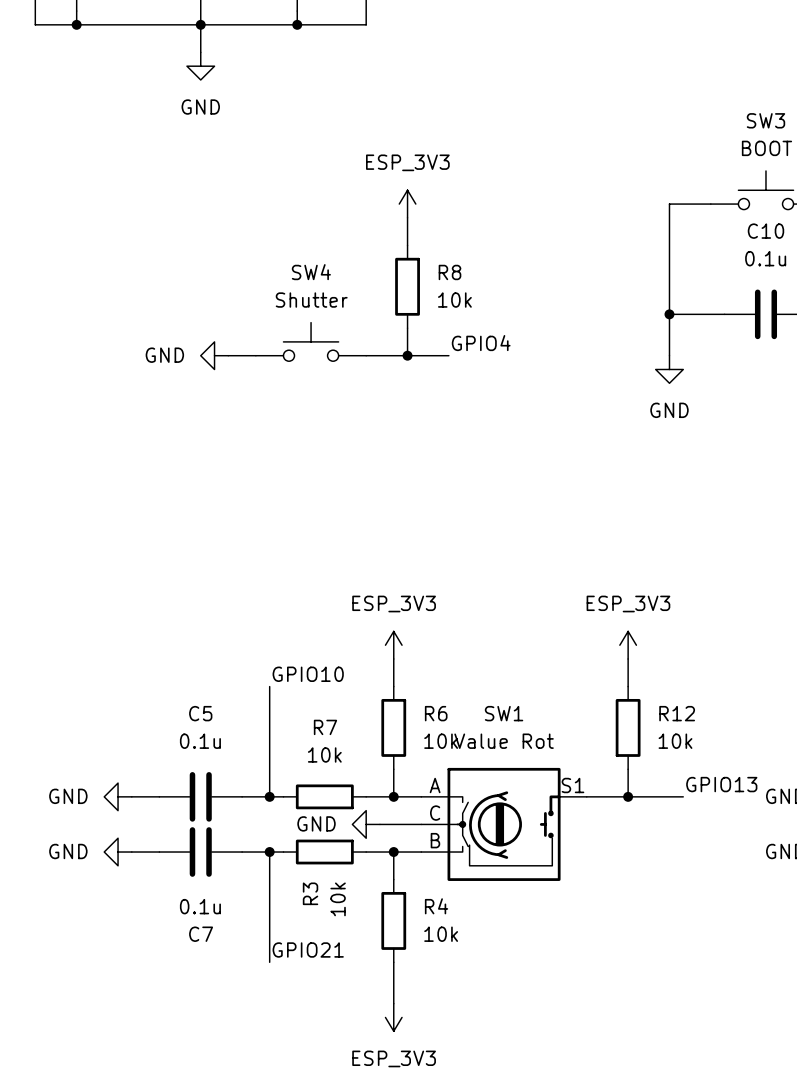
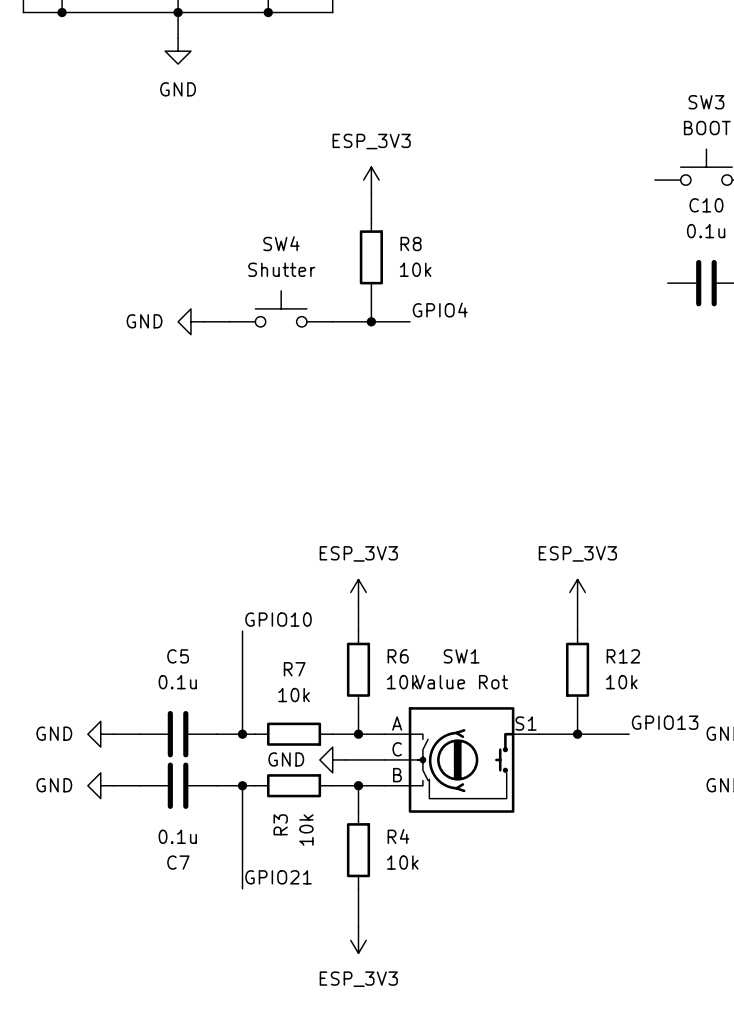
wire: (710, 204) (669, 204) (669, 355) -> none
wire: (669, 314) (724, 314) -> none
junction: (669, 314) -> none
power symbol: GND (669, 369) -> none

